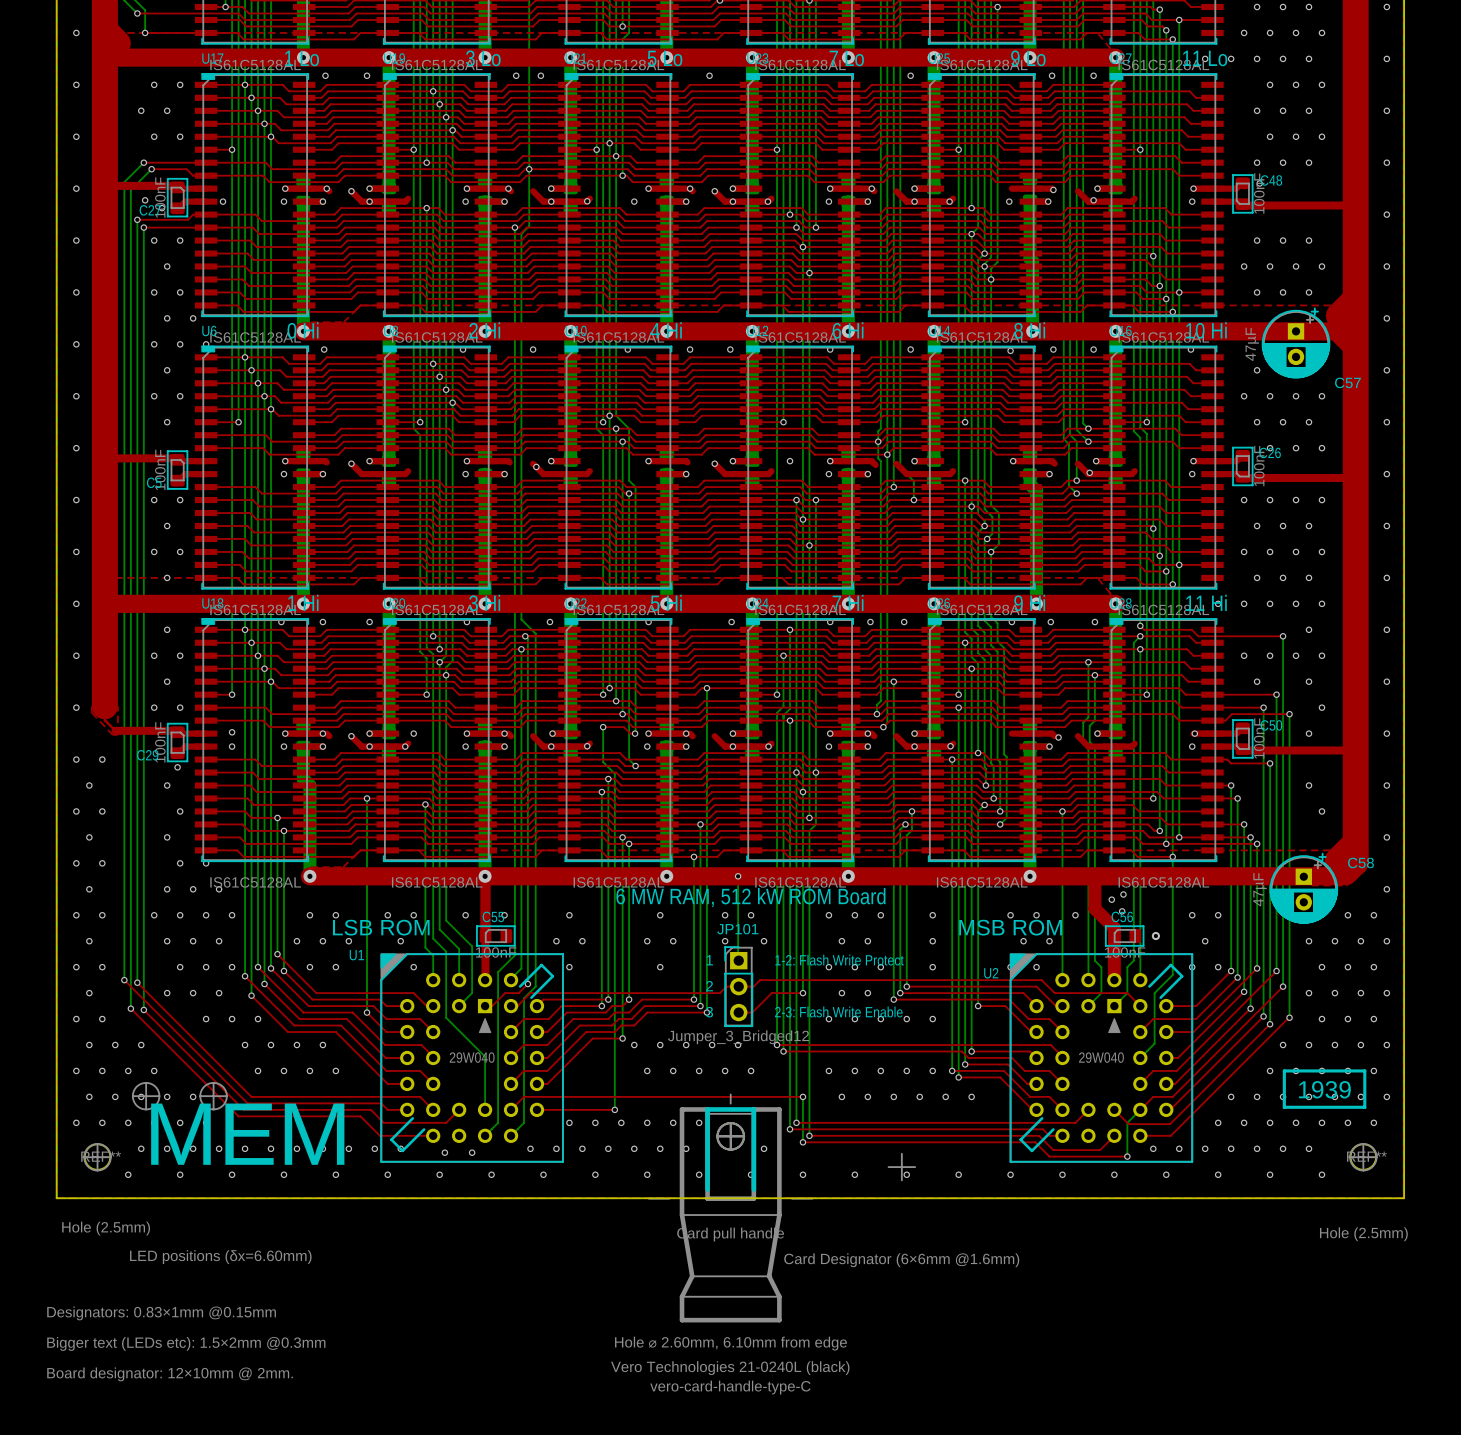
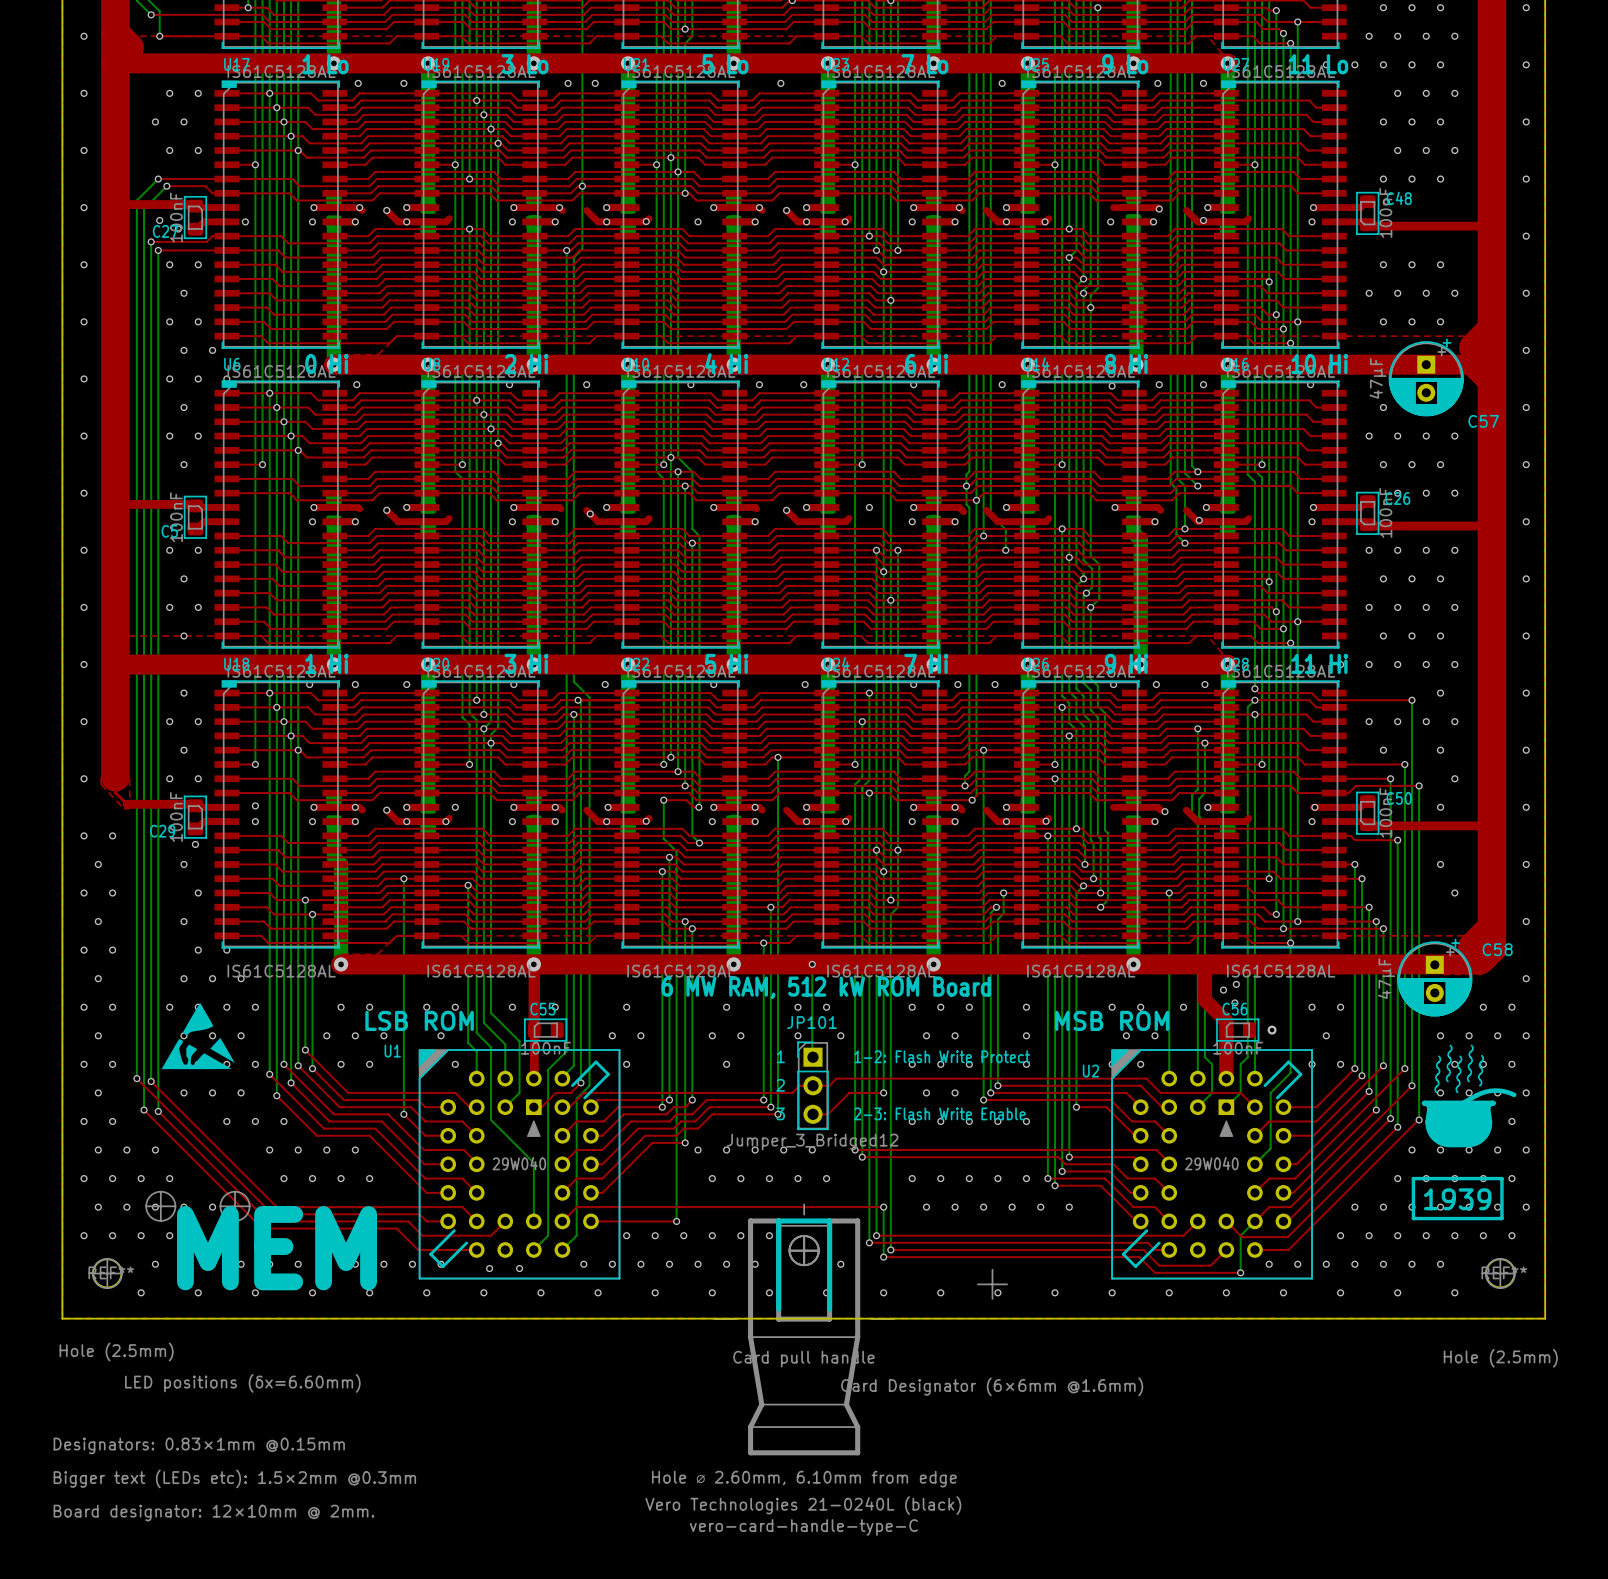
drawing: none -> [161, 1002, 235, 1070]
drawing: none -> [1421, 1044, 1517, 1148]

